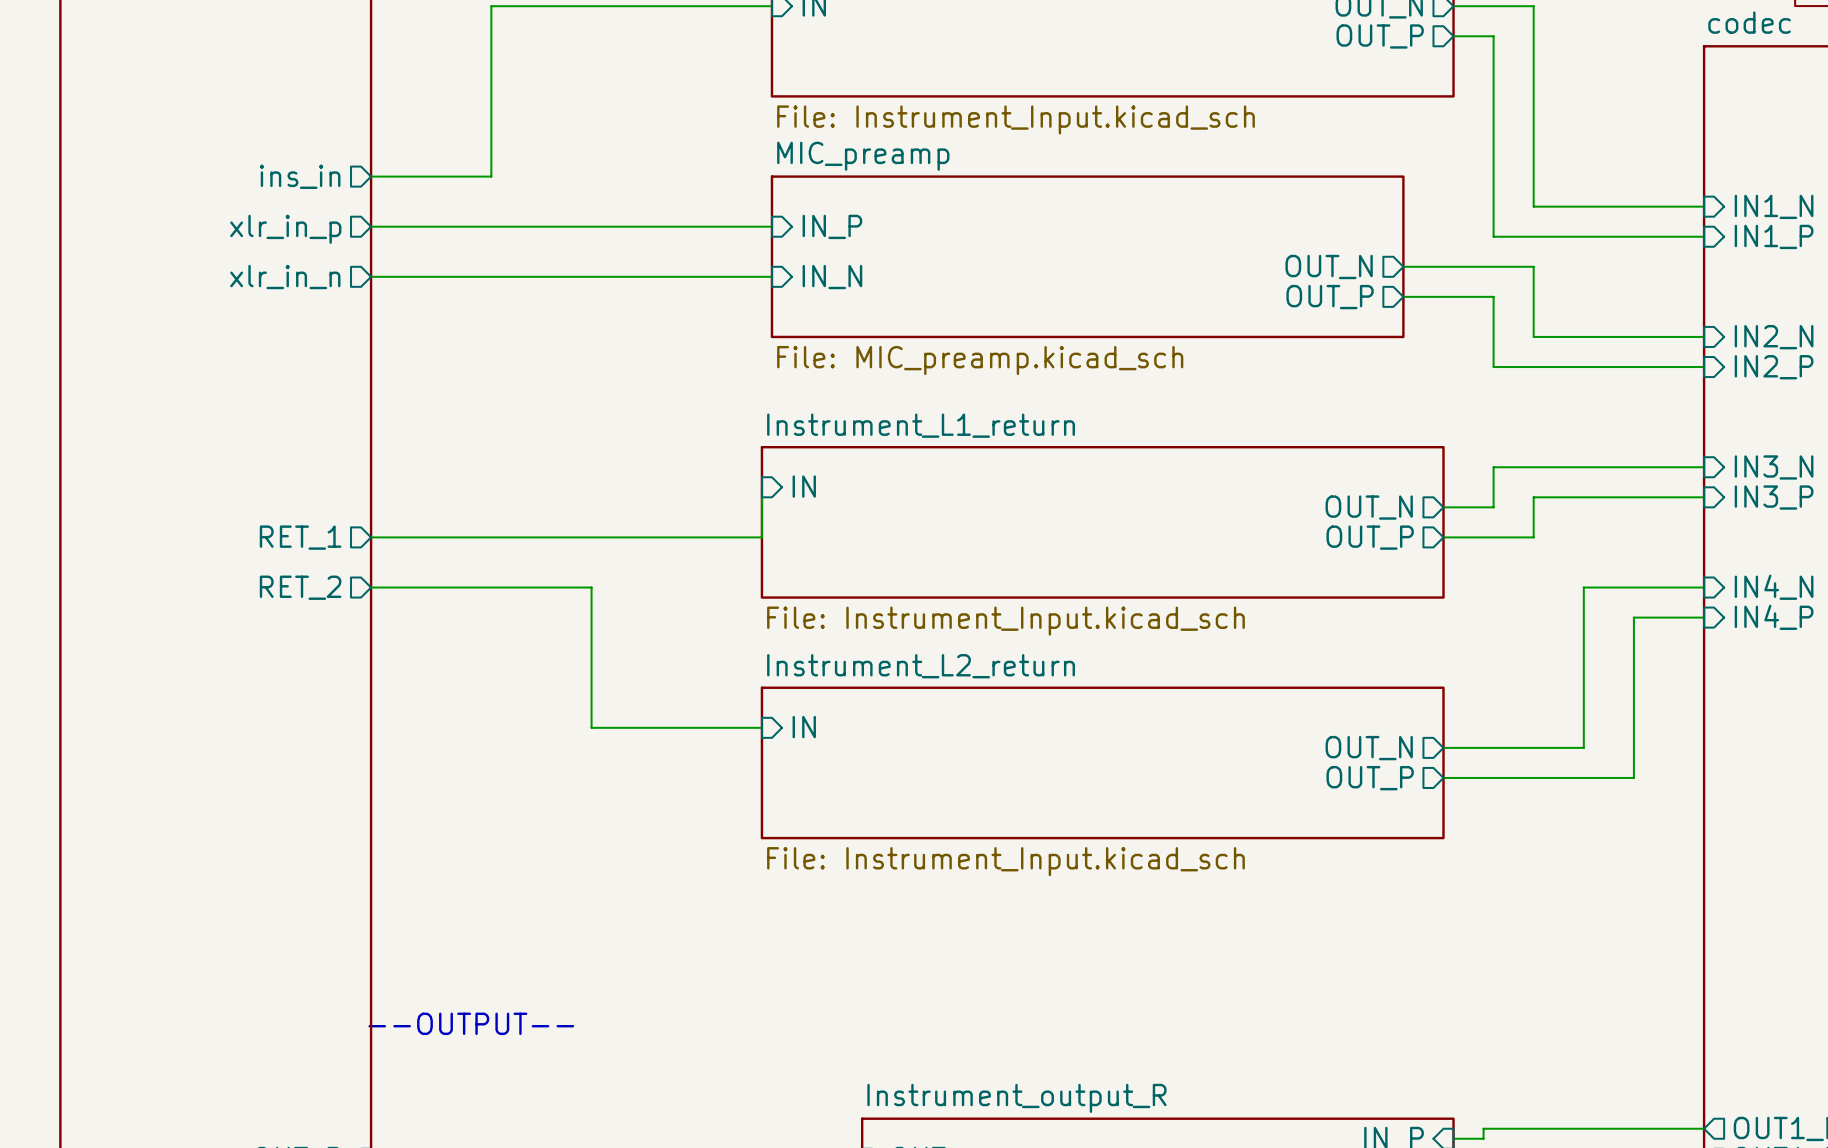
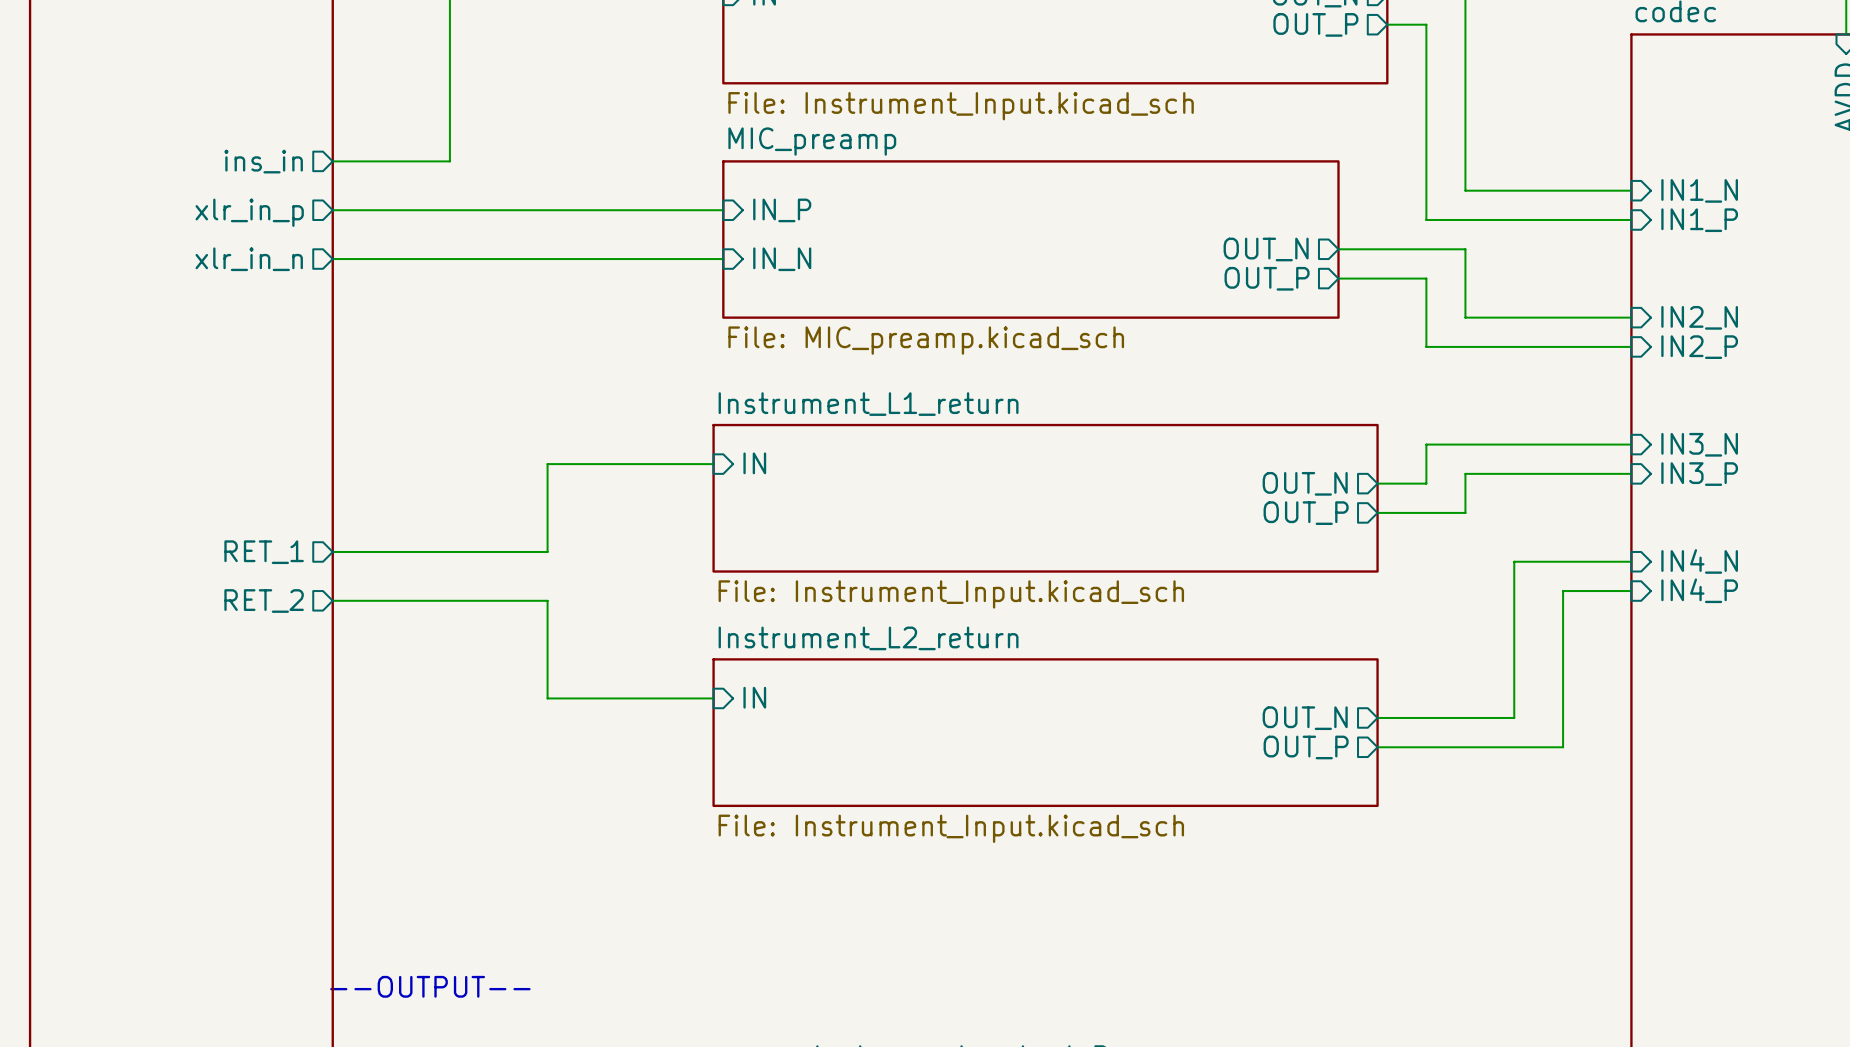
wire: (761, 487) (761, 537) (371, 537) -> (713, 464) (547, 464) (547, 551) (332, 551)
sheet pin position: RET_1 (300, 537) -> RET_1 (264, 552)
sheet pin position: RET_2 (300, 587) -> RET_2 (264, 601)
wire: (371, 587) (591, 587) (591, 627) -> (332, 600) (547, 600)

